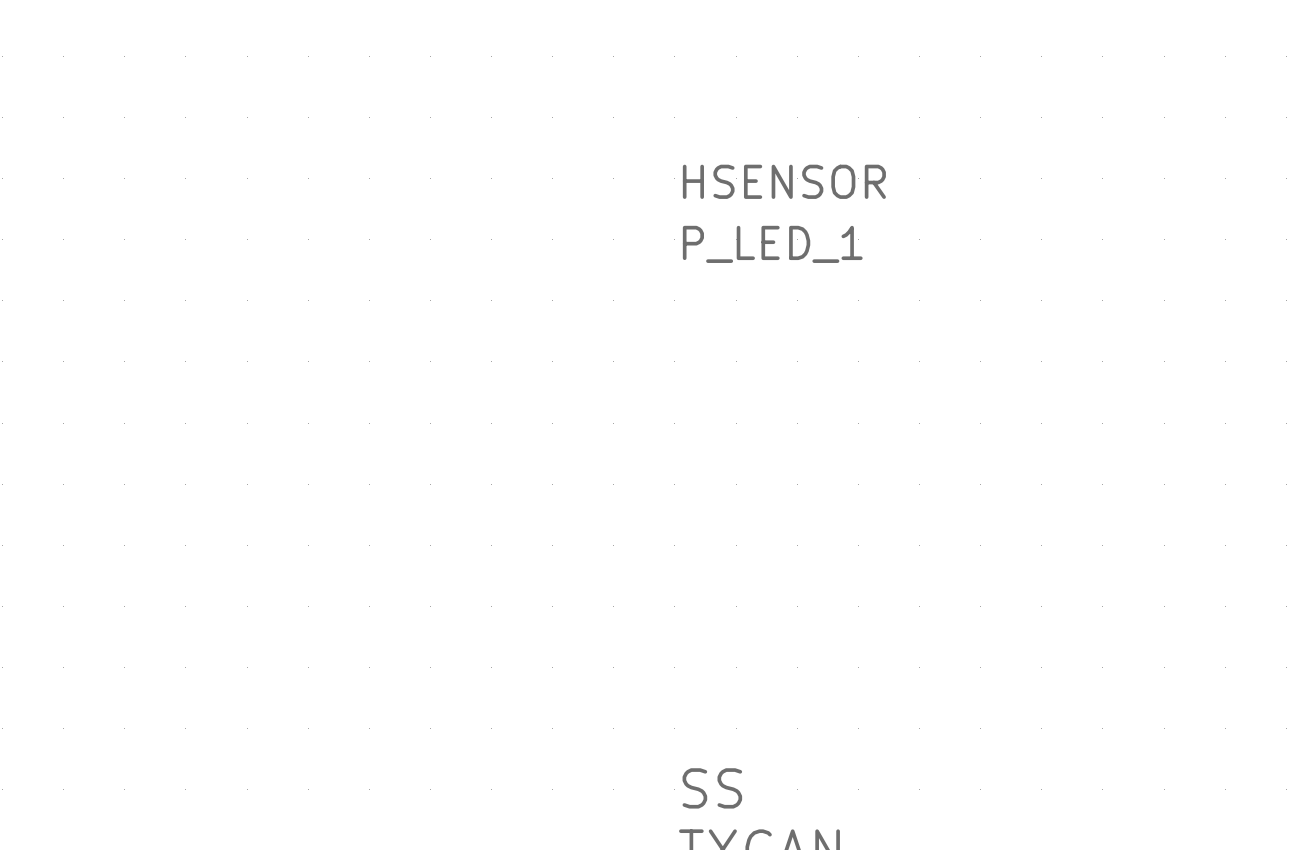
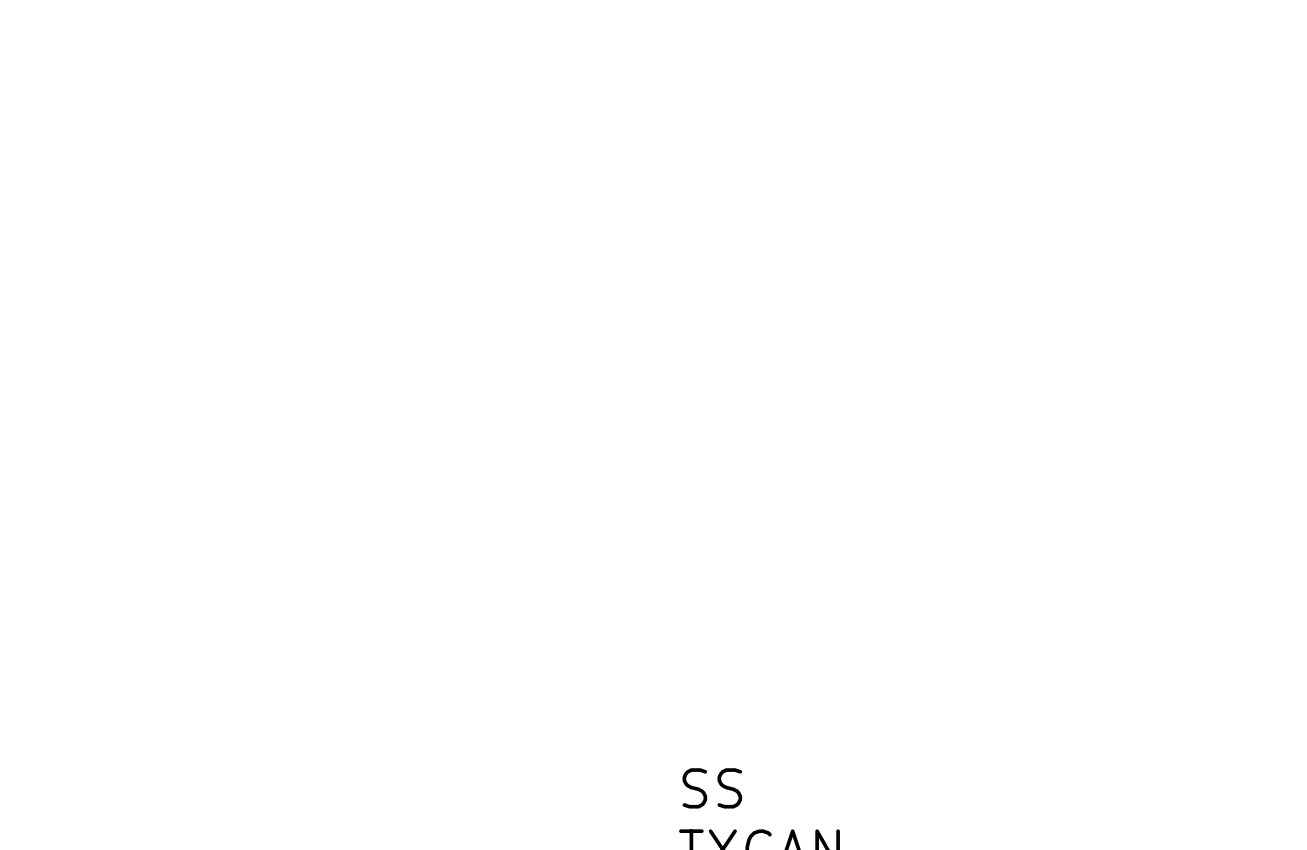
label: HSENSOR (784, 181) -> none
label: P_LED_1 (772, 244) -> none

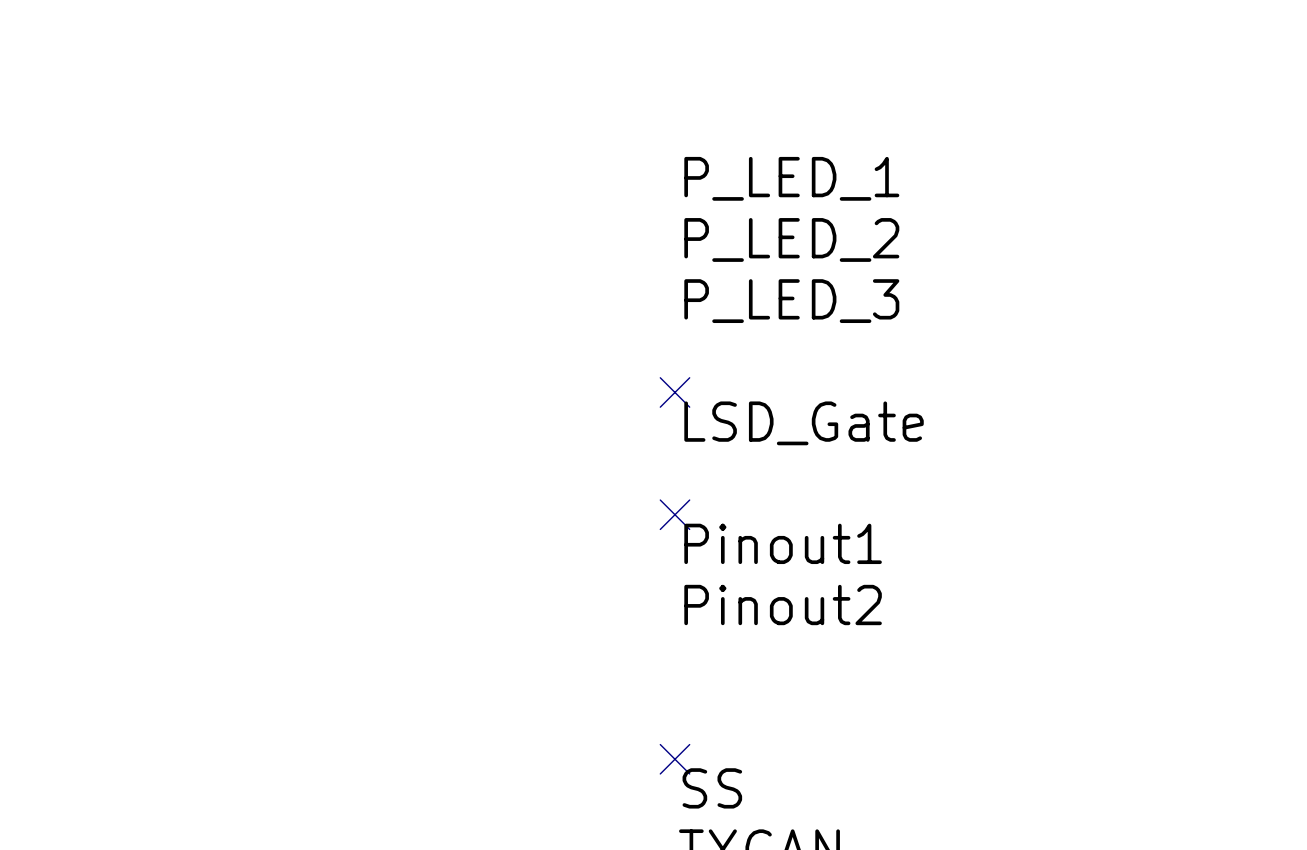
label: none -> P_LED_1 (791, 178)
label: none -> P_LED_2 (791, 239)
label: none -> P_LED_3 (791, 301)
no-connect mark: none -> (674, 392)
label: none -> LSD_Gate (804, 423)
no-connect mark: none -> (674, 514)
label: none -> Pinout1 (783, 543)
label: none -> Pinout2 (783, 605)
no-connect mark: none -> (674, 759)

